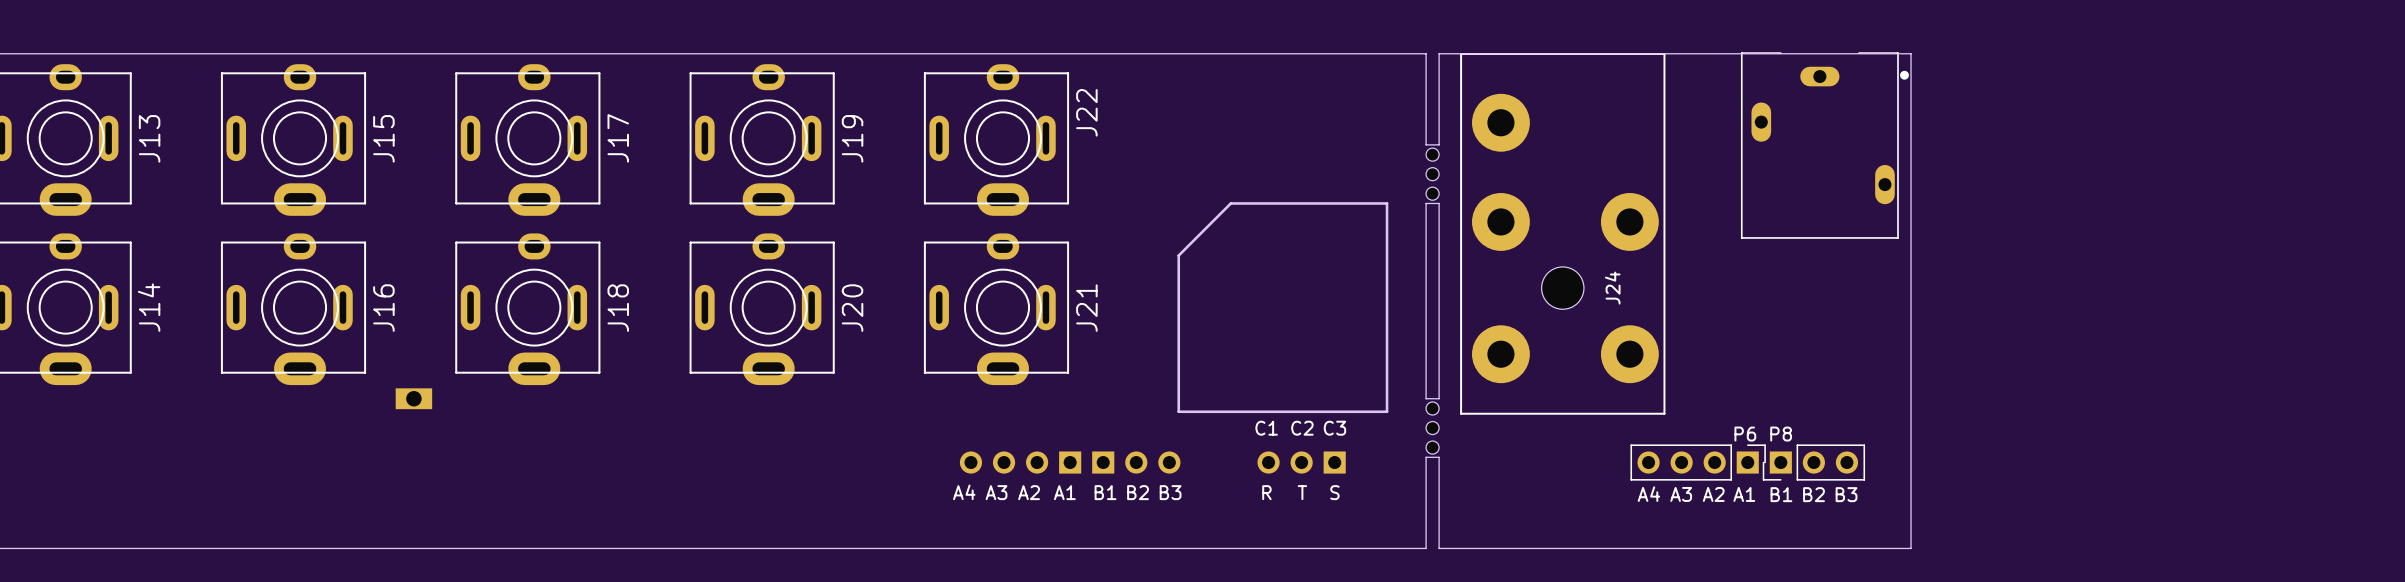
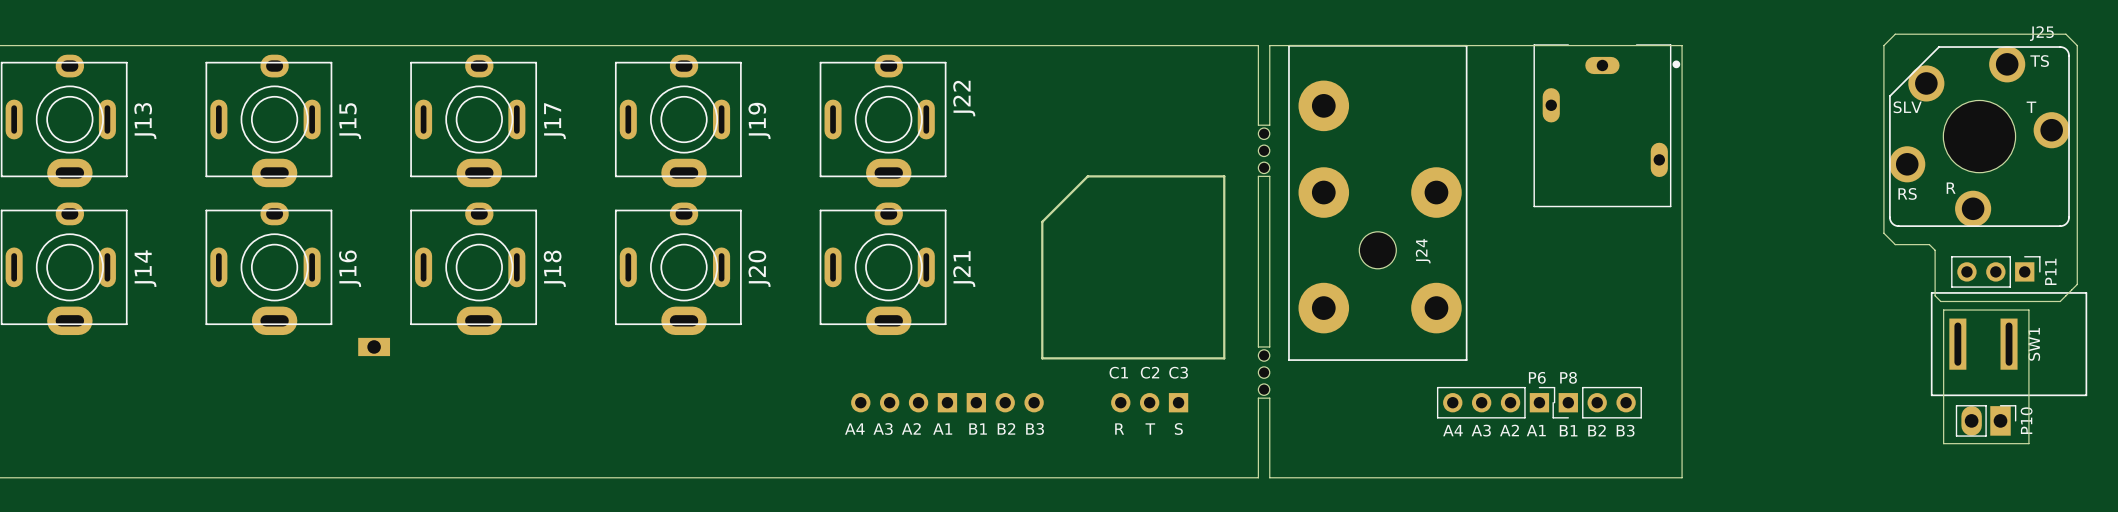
board edge: none -> (1895, 34) (1883, 45) (1883, 233) (1895, 244) (1929, 244) (1935, 250) (1935, 295) (1940, 301) (2060, 301) (2077, 284) (2077, 45) (2065, 34) (1895, 34)
J25: none -> (1979, 136)
P11: none -> (1995, 271)
board edge: none -> (1943, 310) (2028, 310) (2028, 443) (1943, 443) (1943, 310)
SW1: none -> (2009, 344)
P10: none -> (1986, 420)

